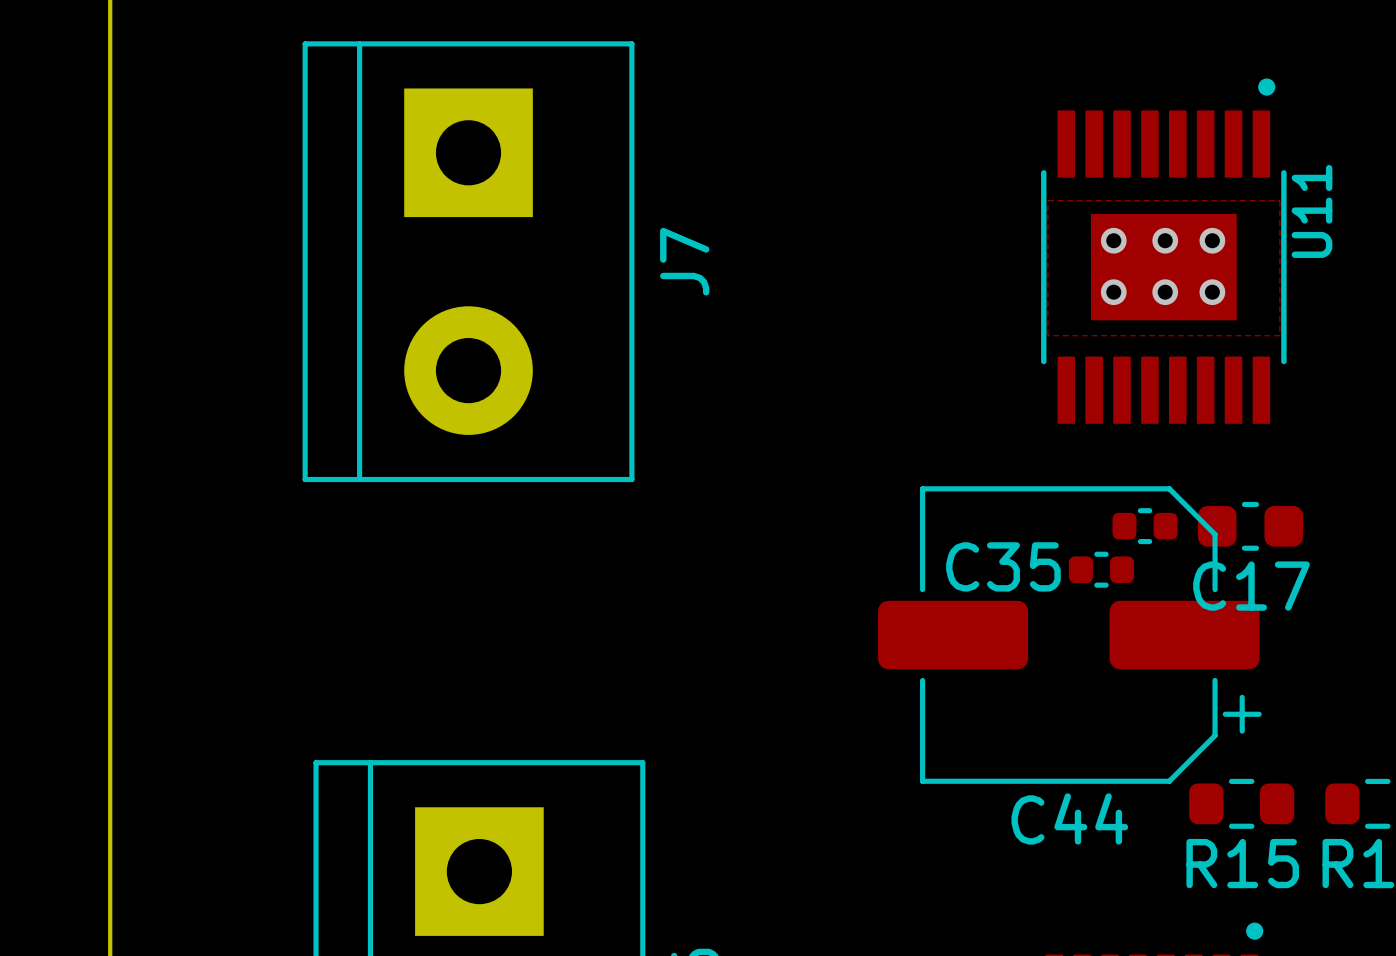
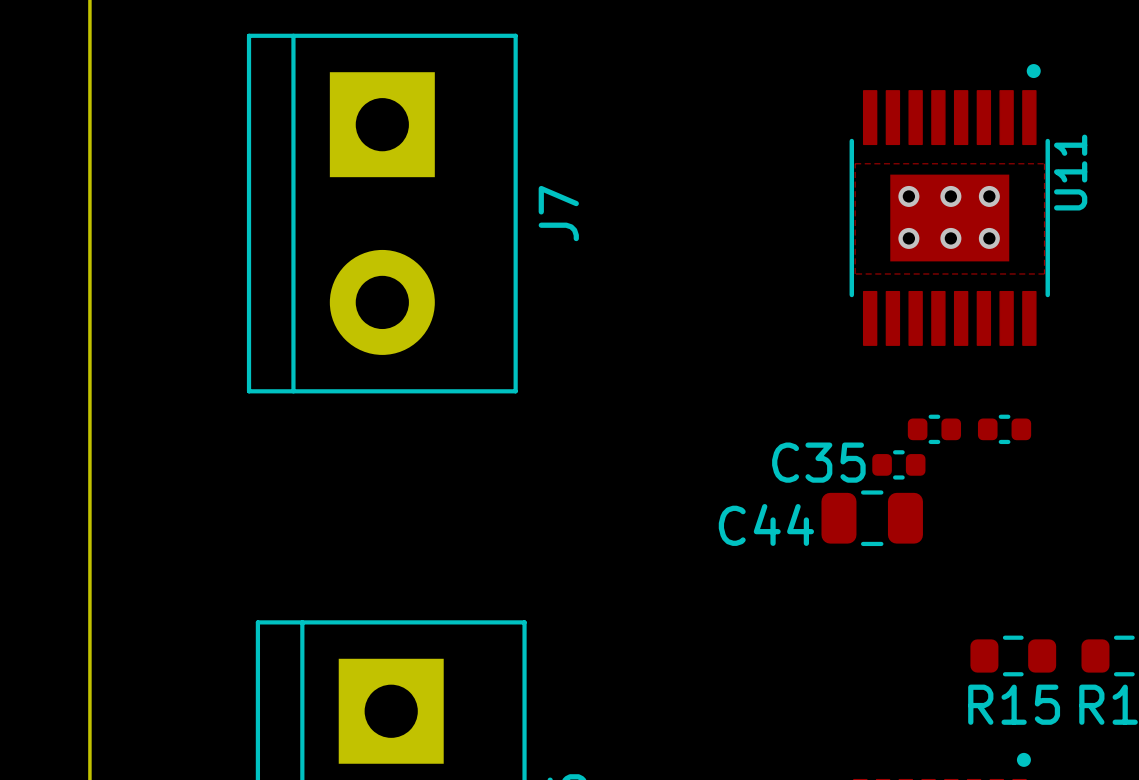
C44 footprint: [878, 486, 1262, 784] -> [821, 490, 923, 547]
part: none -> (1004, 429)
C17: (1250, 526) -> none
C44 name position: C44 (1069, 818) -> C44 (766, 524)

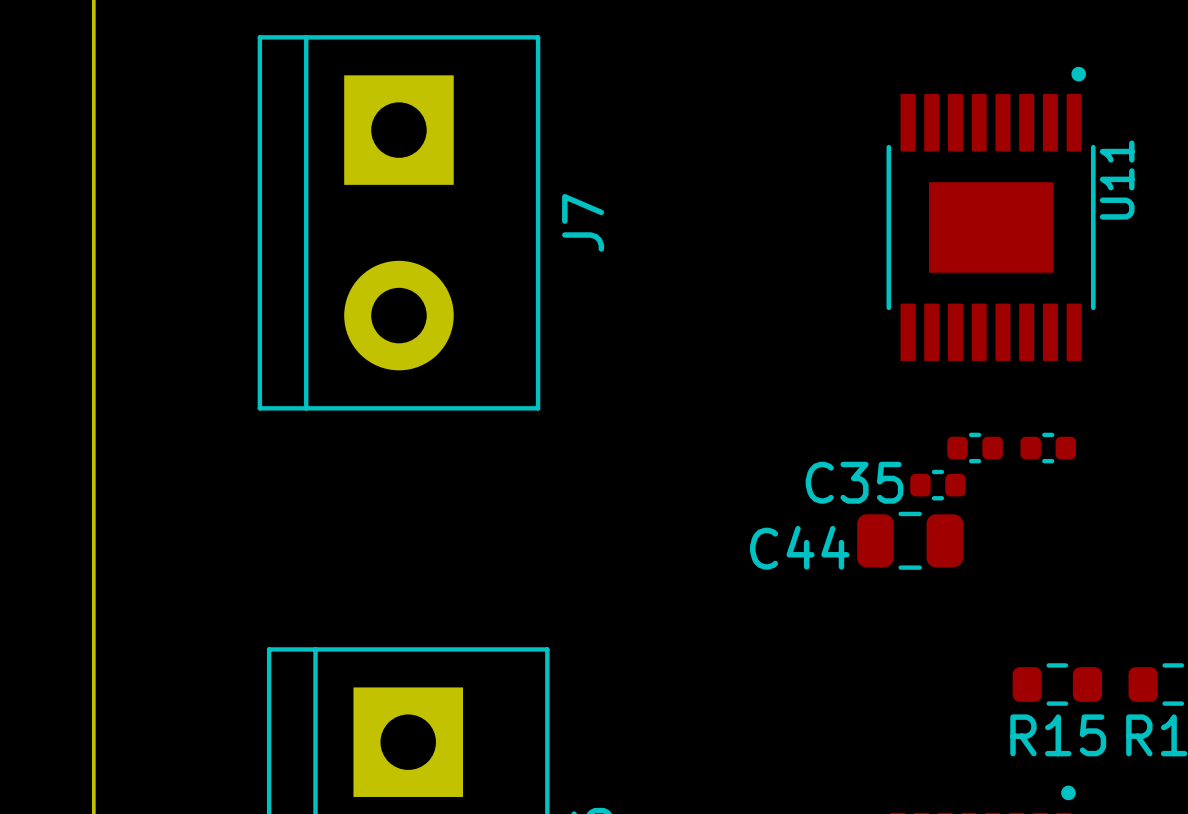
top zone outline: (855, 163) (1044, 163) (1044, 273) (855, 273) (855, 163) -> none
via: (908, 196) -> none
via: (950, 196) -> none
via: (989, 196) -> none
via: (908, 238) -> none
via: (950, 238) -> none
via: (989, 238) -> none

